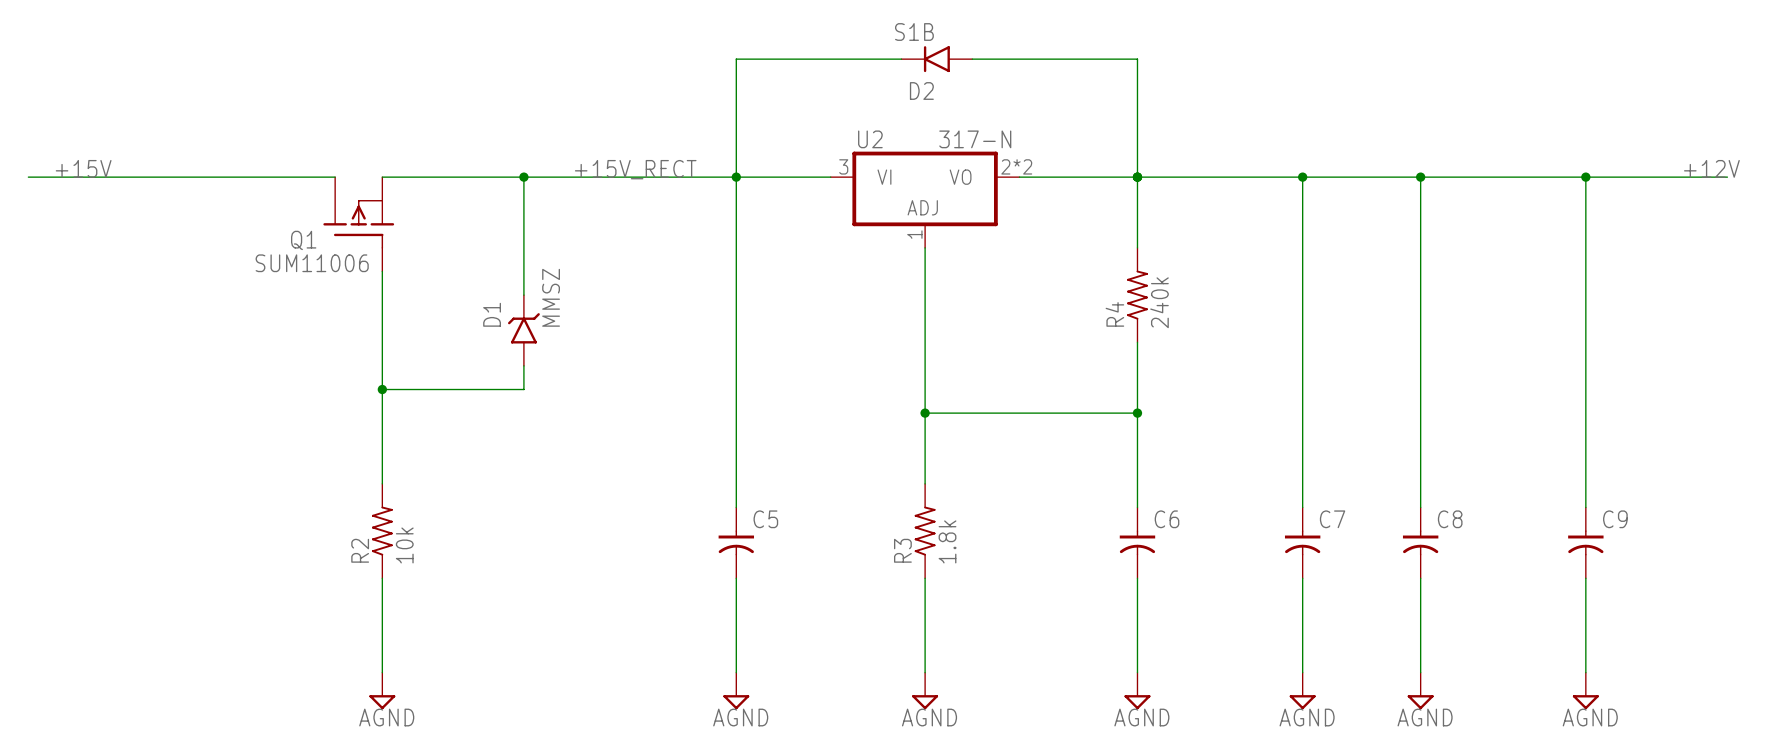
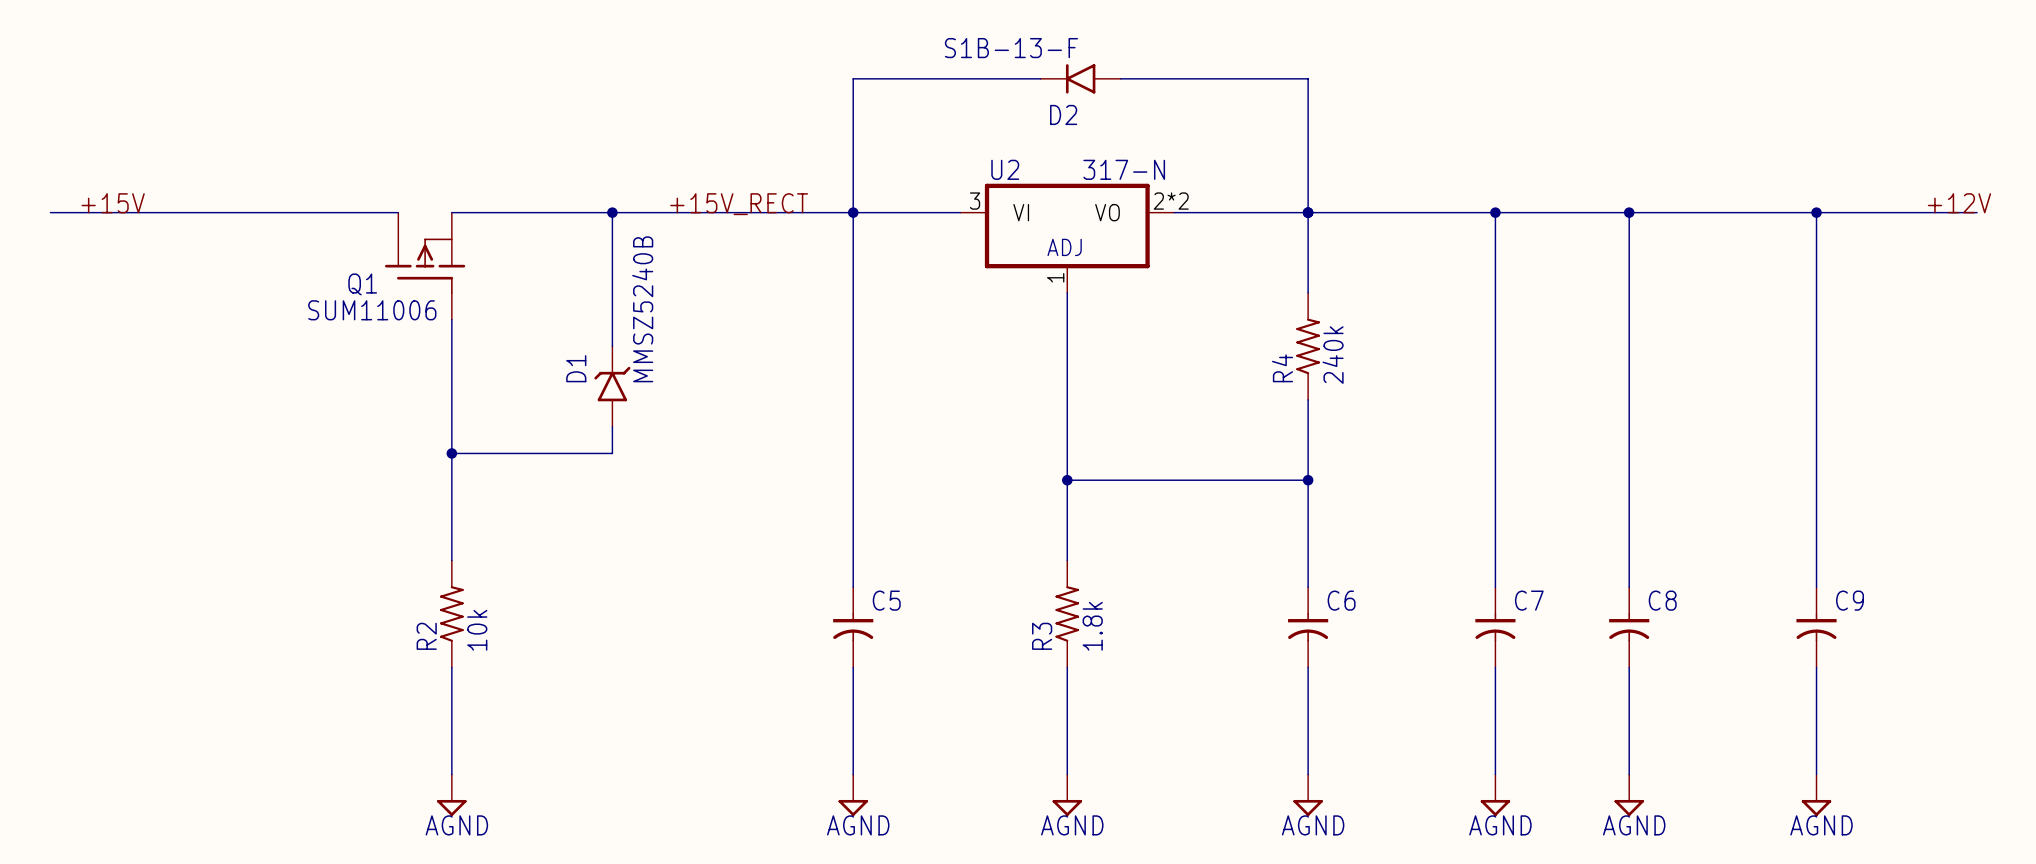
D2 value: S1B (914, 32) -> S1B-13-F (1011, 48)
D1 value: MMSZ (551, 297) -> MMSZ5240B (642, 309)

